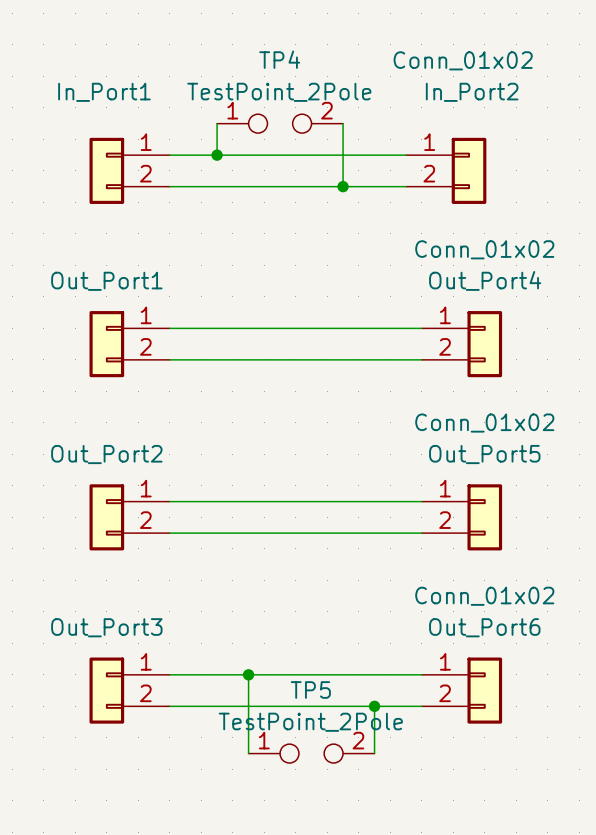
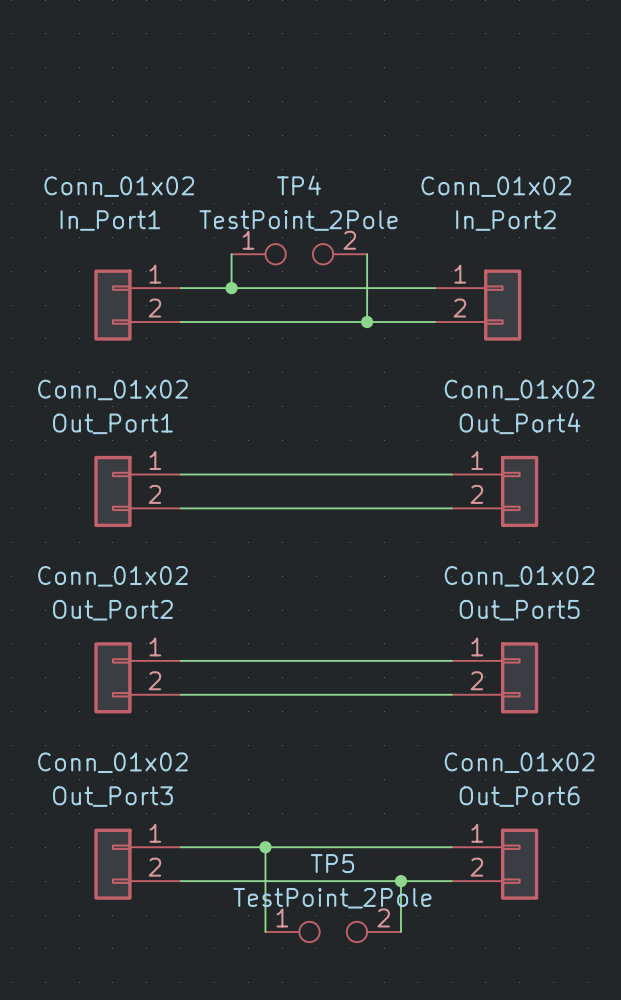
In_Port1 value: none -> Conn_01x02 (119, 186)
Out_Port1 value: none -> Conn_01x02 (112, 389)
Out_Port2 value: none -> Conn_01x02 (112, 576)
Out_Port3 value: none -> Conn_01x02 (112, 762)

